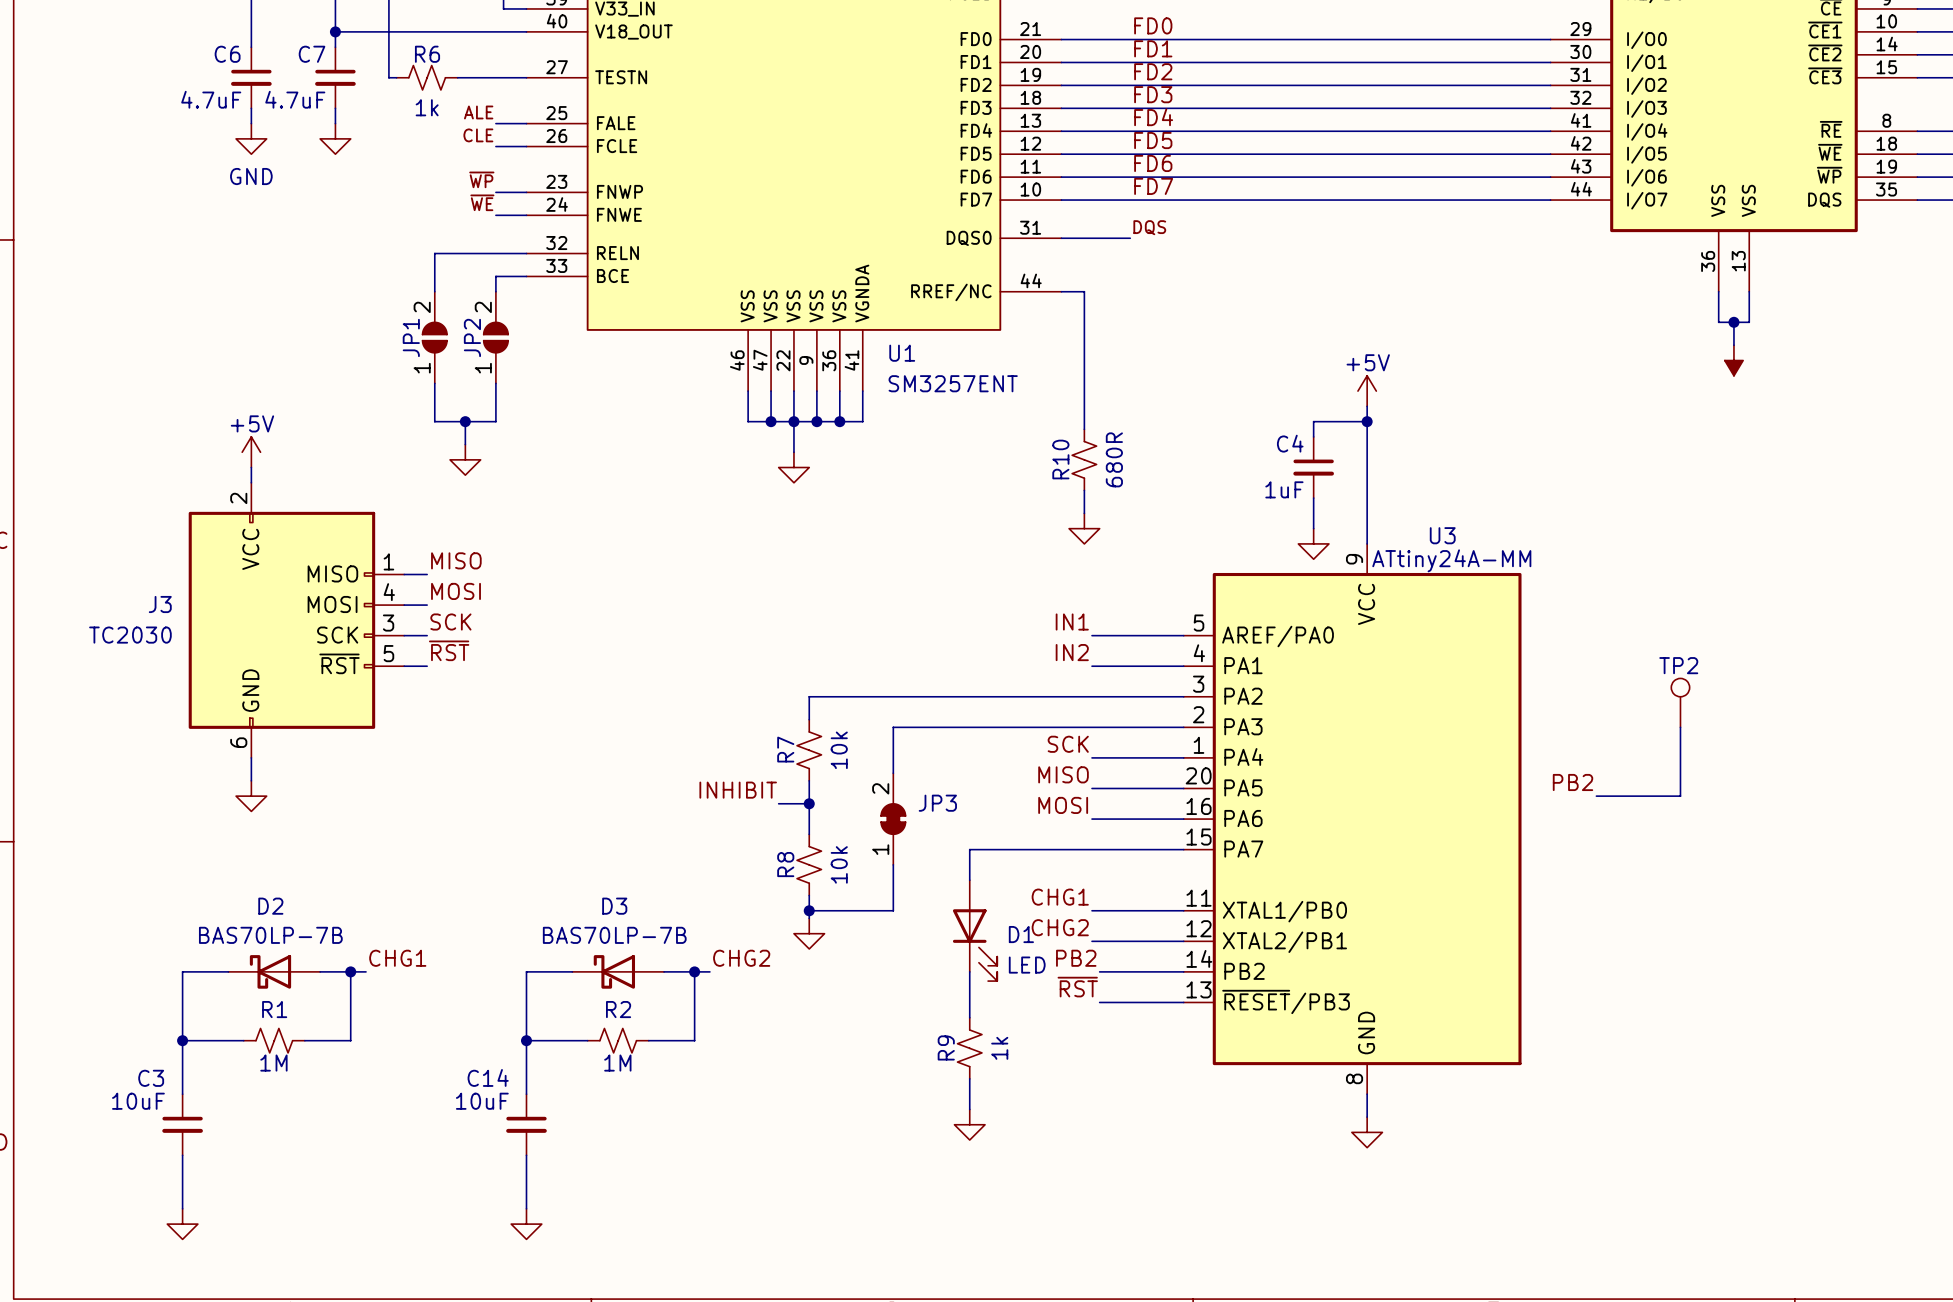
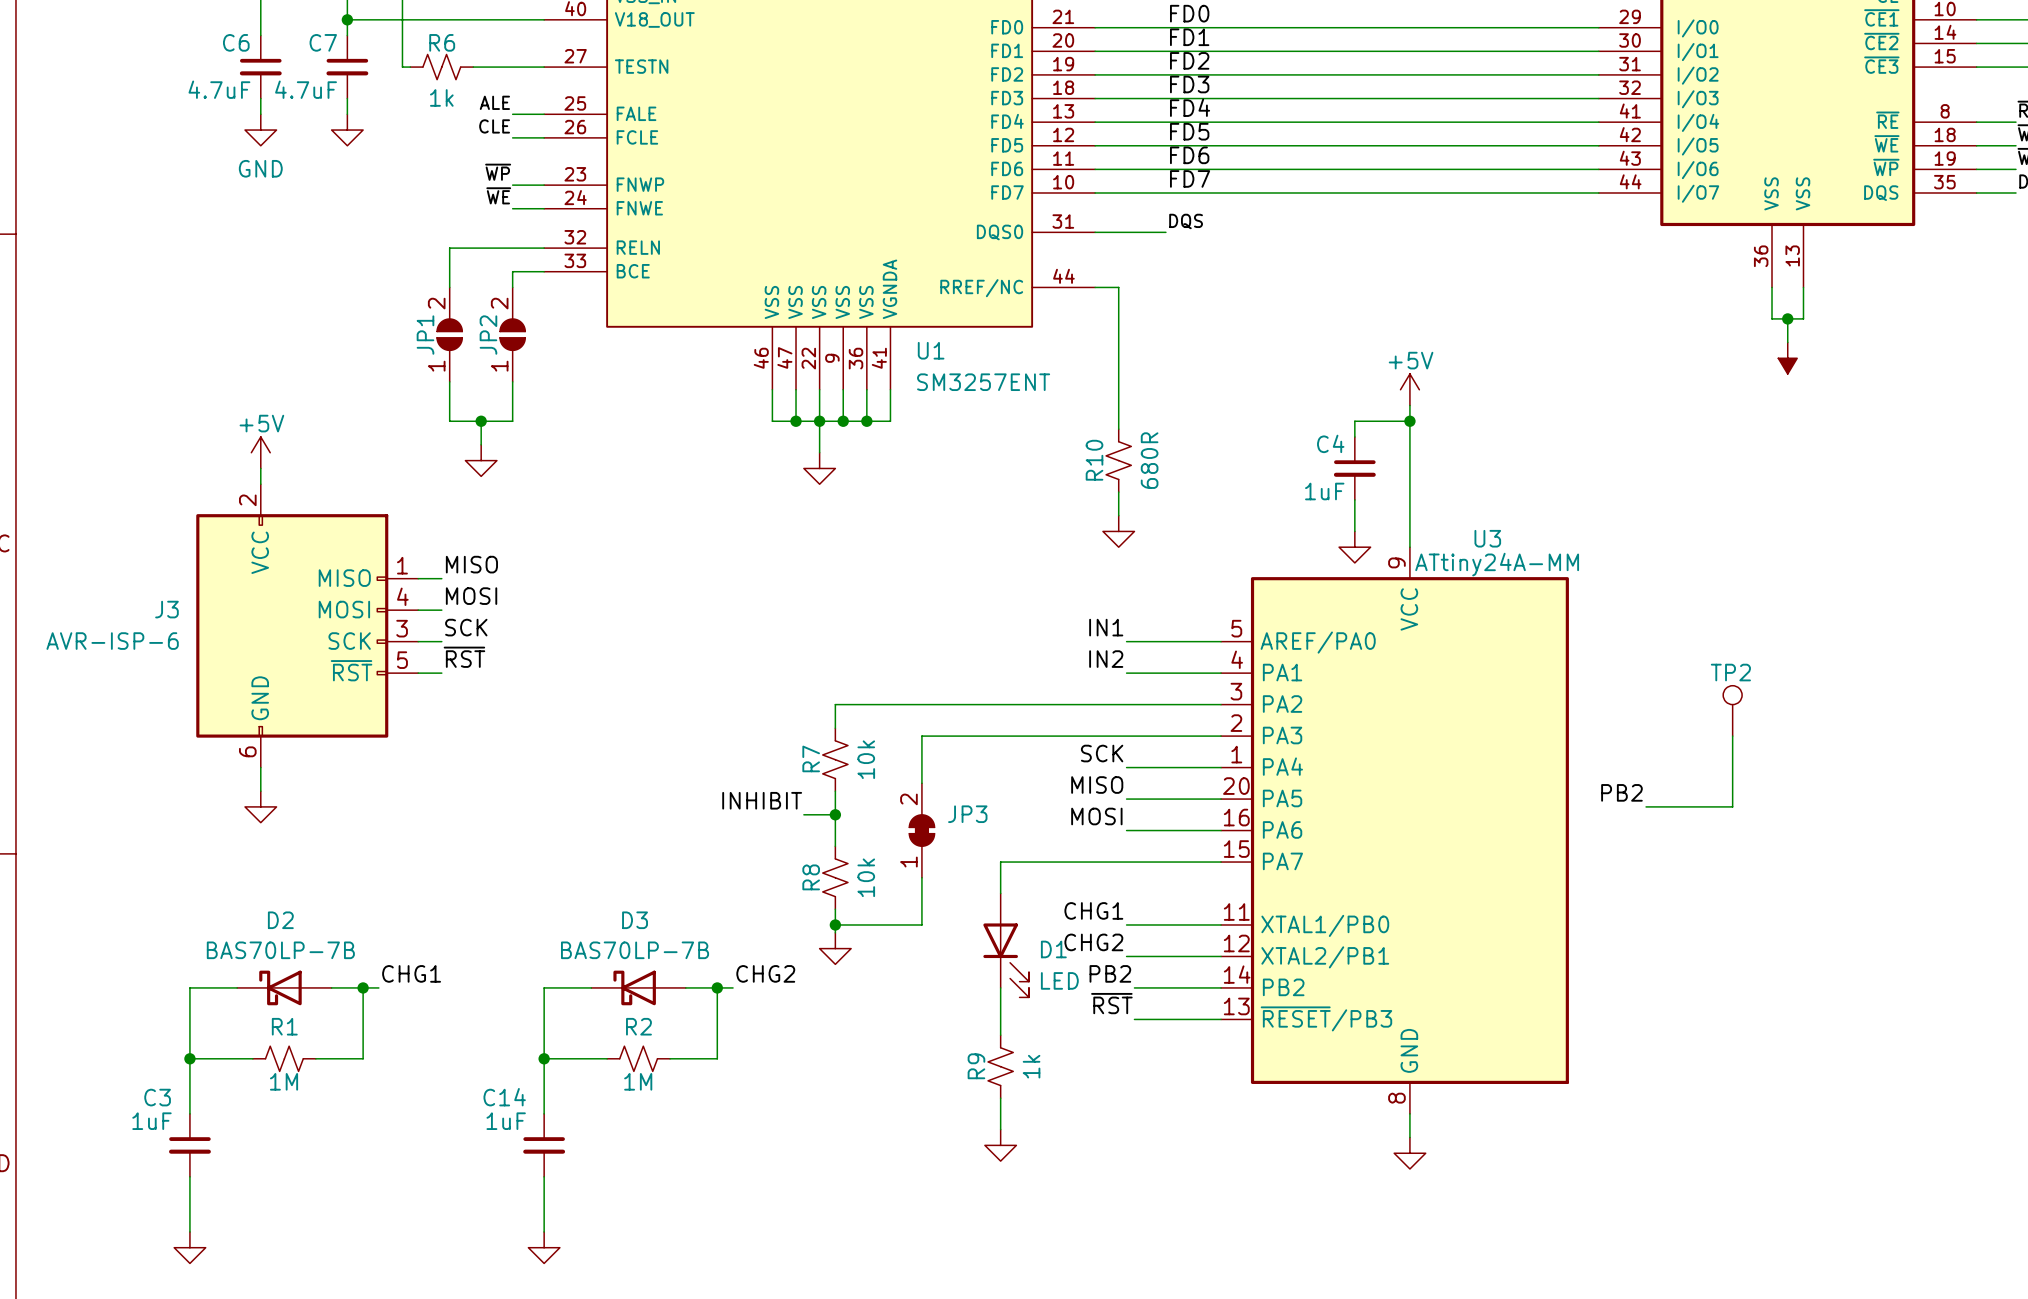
J3 value: TC2030 (130, 635) -> AVR-ISP-6 (112, 641)
C3 value: 10uF (138, 1101) -> 1uF (151, 1121)
C14 value: 10uF (482, 1101) -> 1uF (506, 1121)

